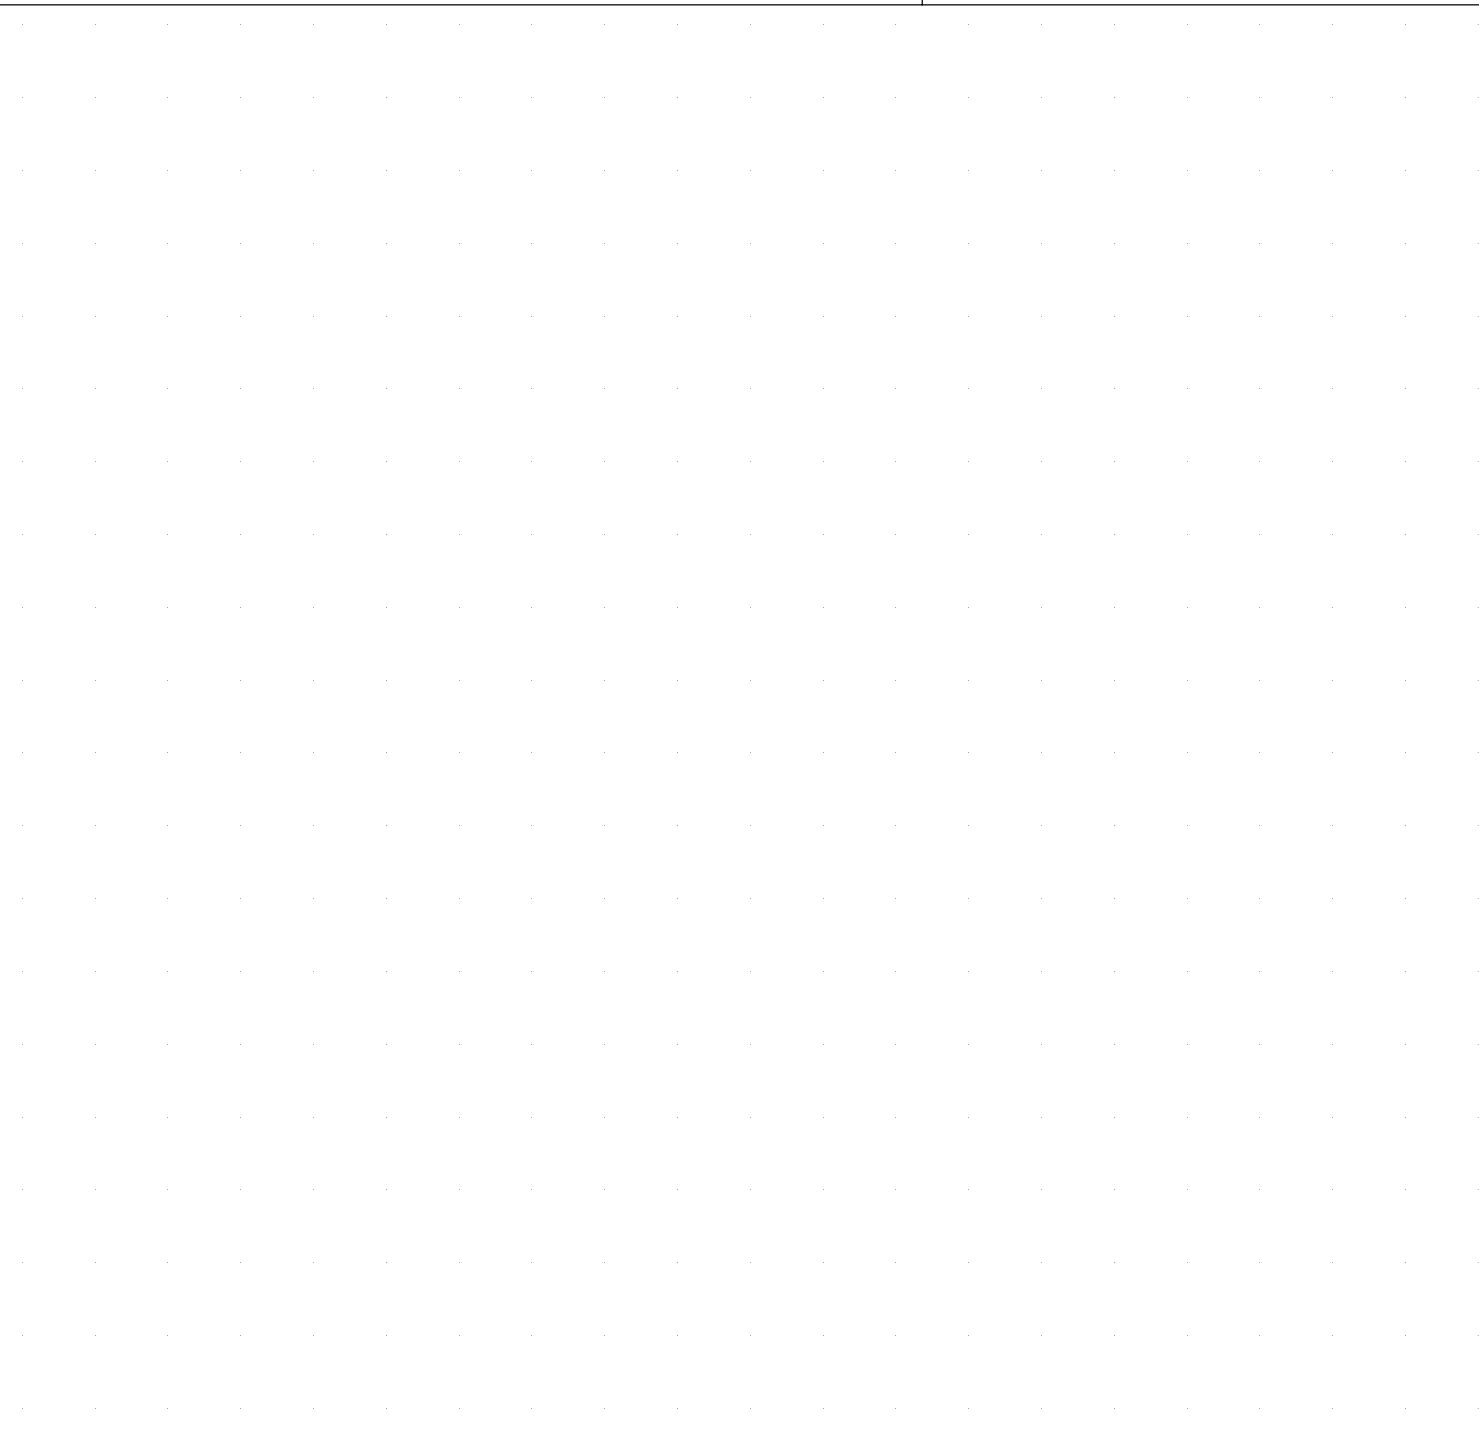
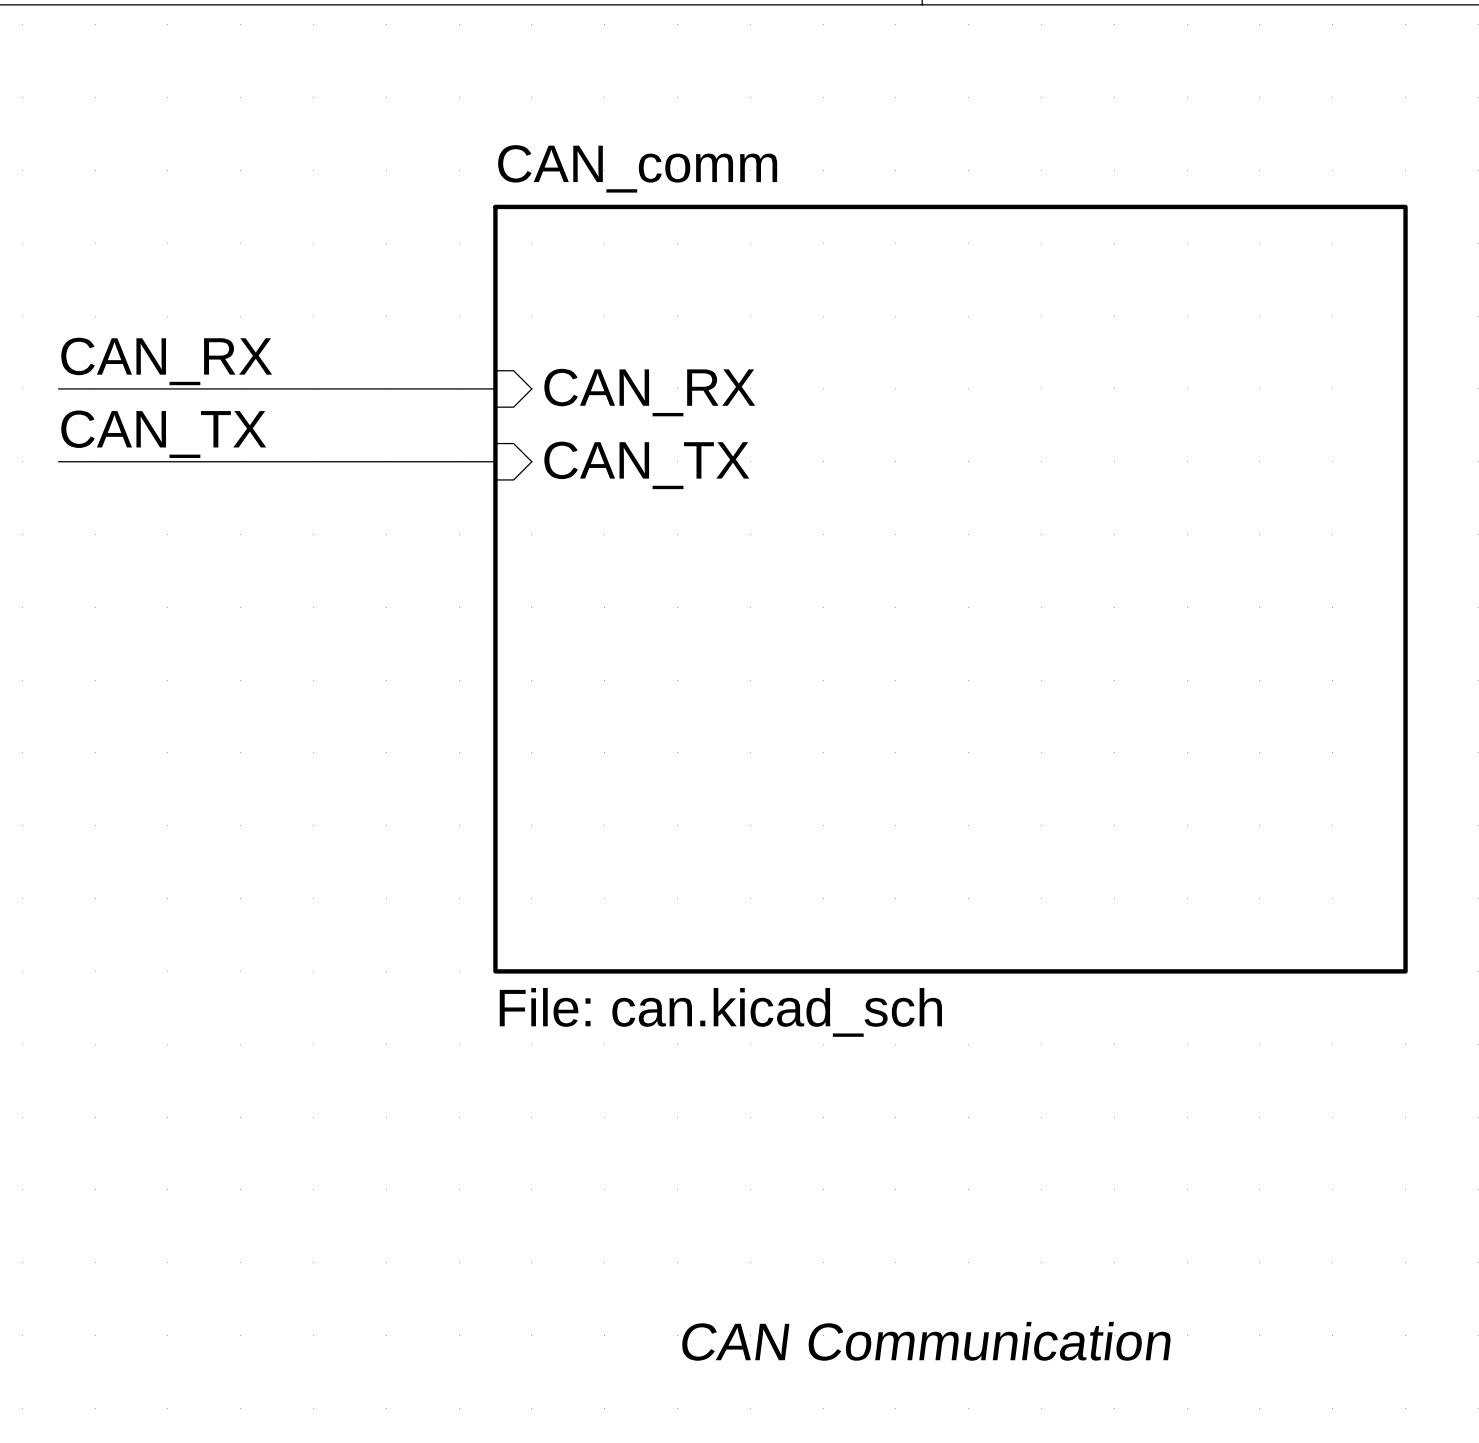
label: none -> CAN_RX (166, 361)
wire: none -> (58, 388) (495, 388)
sheet pin: none -> CAN_RX (649, 392)
label: none -> CAN_TX (163, 434)
wire: none -> (58, 461) (495, 461)
sheet pin: none -> CAN_TX (646, 465)
sheet CAN_comm: none -> File: can.kicad_sch (950, 589)
text: none -> CAN Communication (926, 1341)

